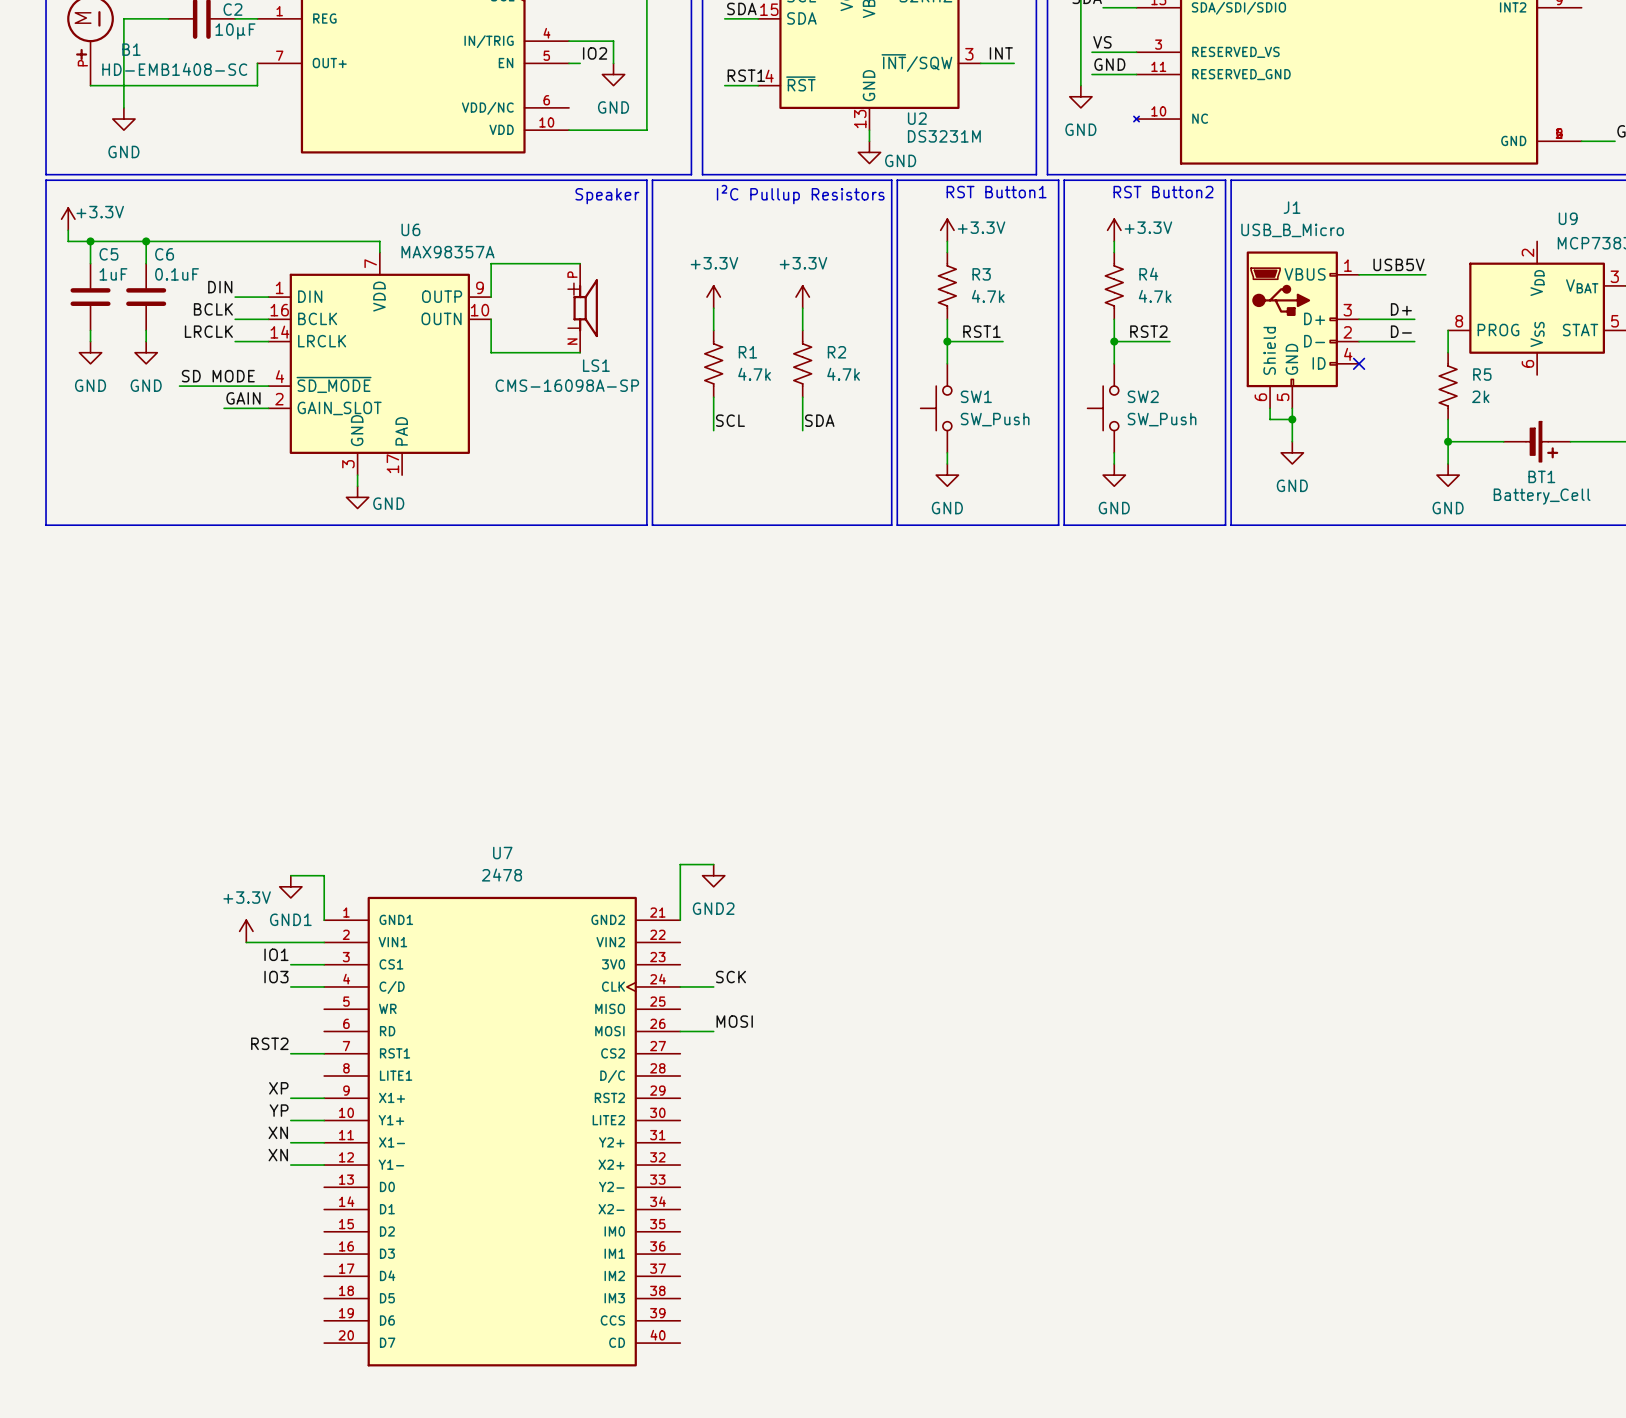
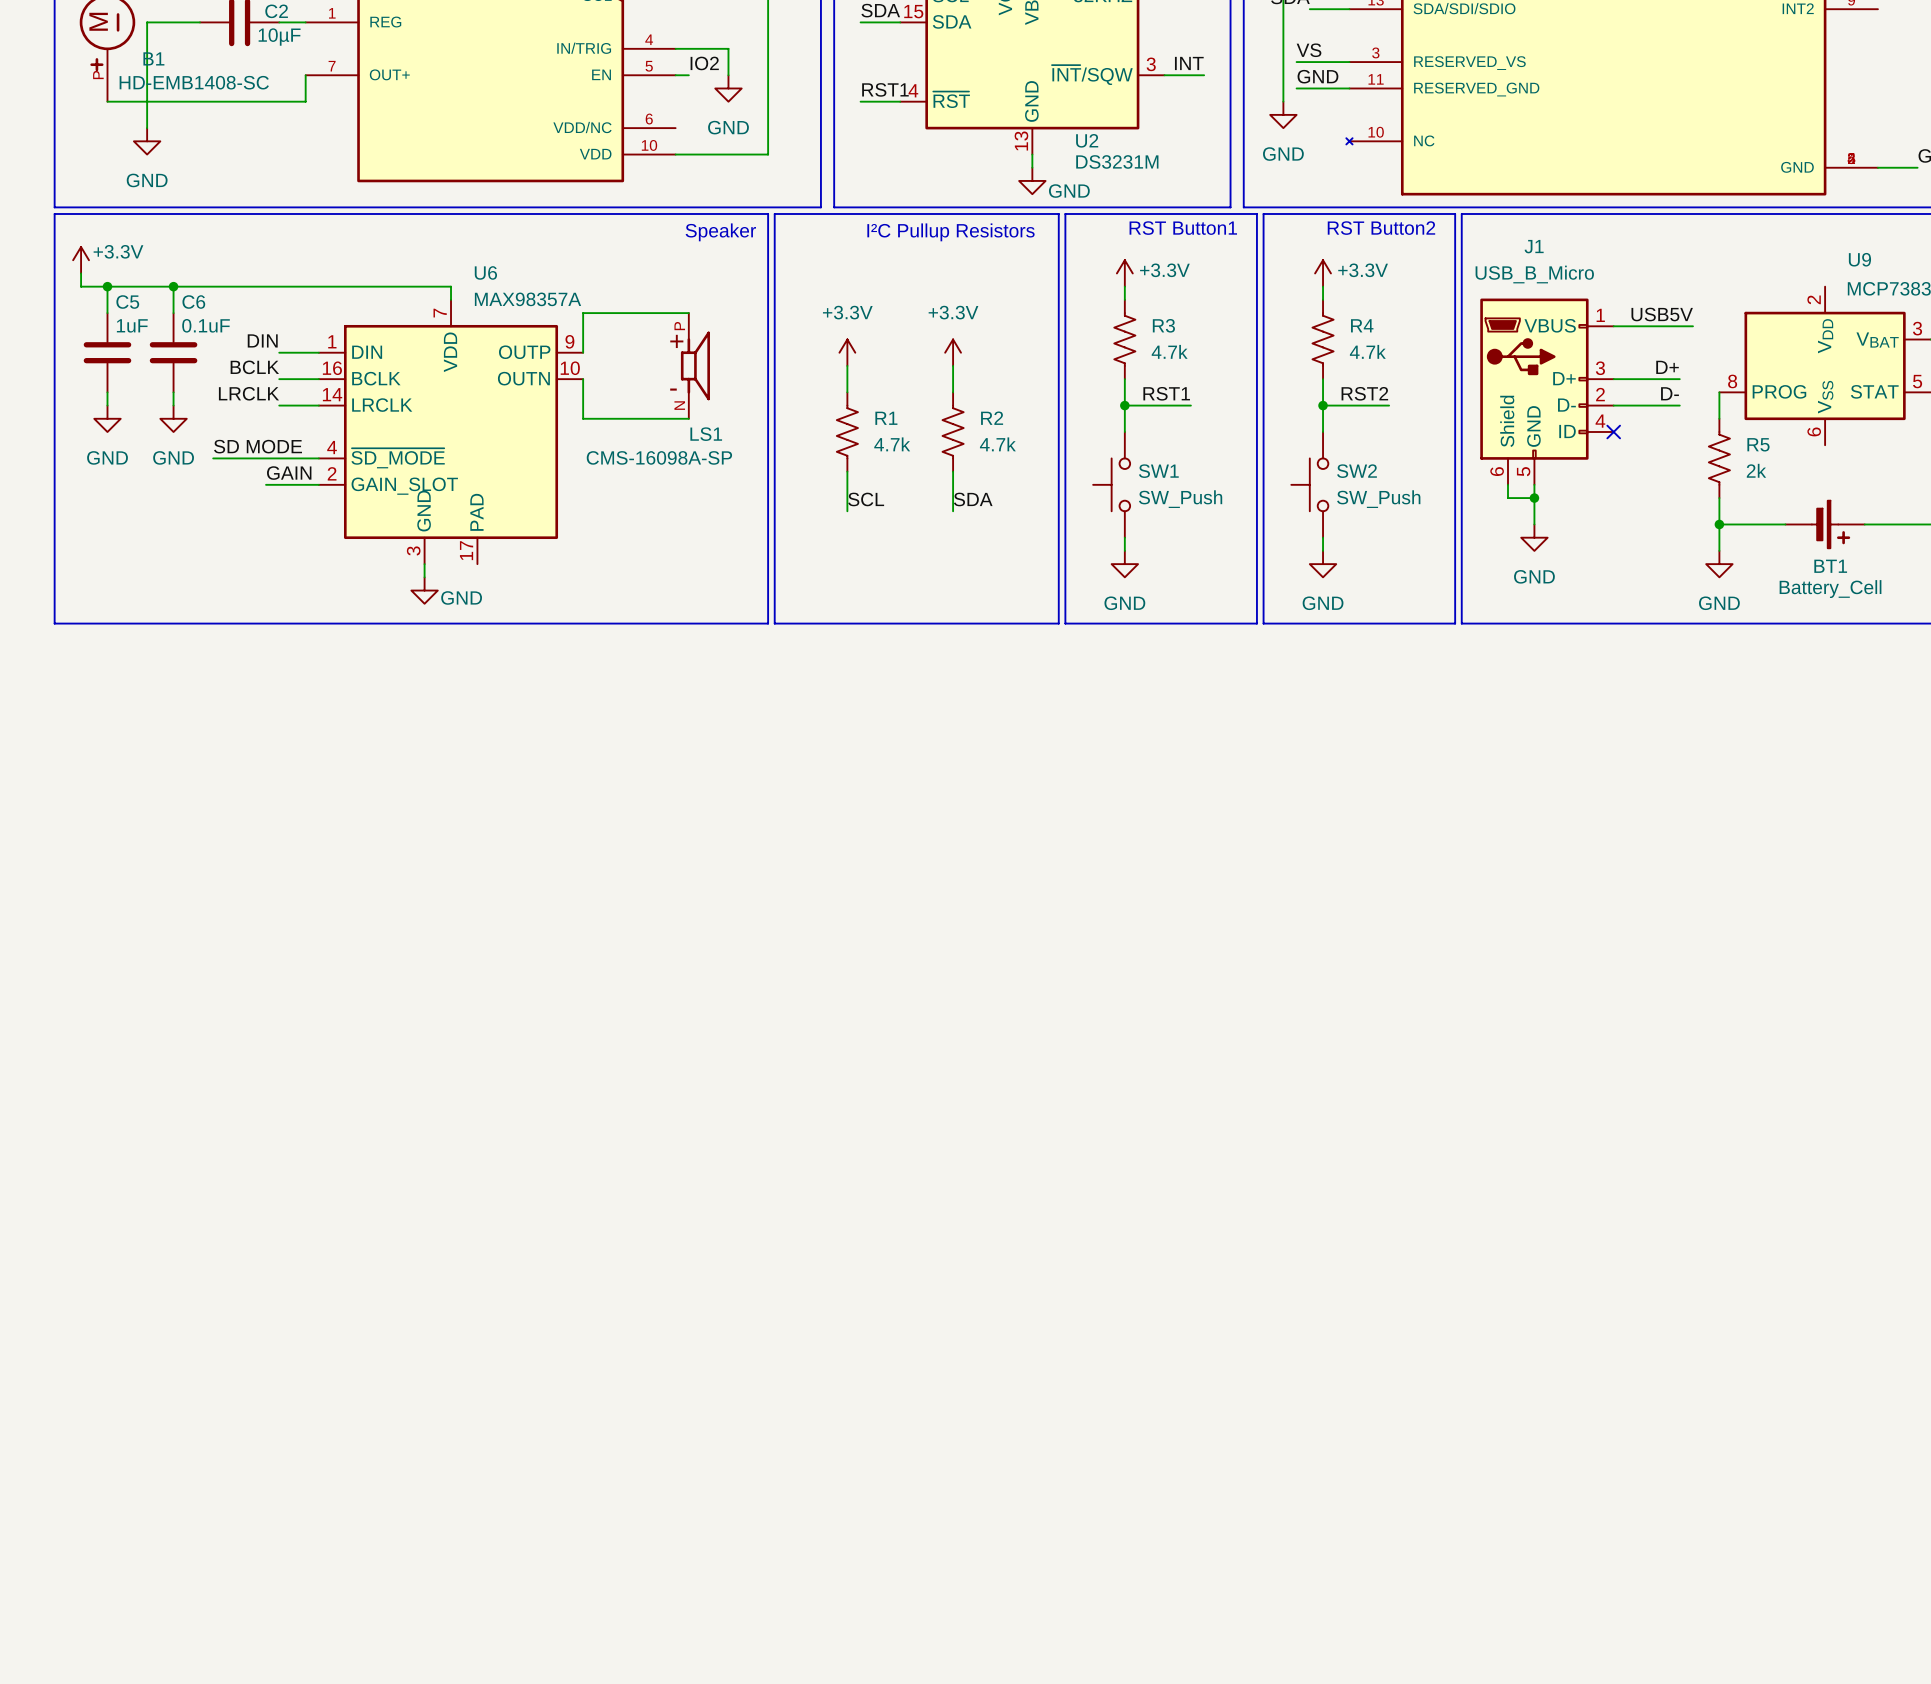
wire: (713, 864) (680, 864) (680, 920) -> none
wire: (290, 875) (324, 875) (324, 920) -> none
power symbol: GND2 (713, 875) -> none
power symbol: GND1 (290, 886) -> none
power symbol: +3.3V (246, 931) -> none
wire: (246, 942) (324, 942) -> none
label: IO1 (276, 954) -> none
wire: (290, 964) (324, 964) -> none
label: IO3 (276, 977) -> none
label: SCK (730, 977) -> none
wire: (290, 986) (324, 986) -> none
wire: (680, 986) (713, 986) -> none
label: MOSI (734, 1021) -> none
wire: (680, 1031) (713, 1031) -> none
label: RST2 (269, 1043) -> none
wire: (290, 1053) (324, 1053) -> none
label: XP (278, 1088) -> none
wire: (290, 1098) (324, 1098) -> none
label: YP (279, 1110) -> none
wire: (290, 1120) (324, 1120) -> none
U7: 2478 (502, 1131) -> none
label: XN (278, 1132) -> none
wire: (290, 1142) (324, 1142) -> none
label: XN (278, 1155) -> none
wire: (290, 1165) (324, 1165) -> none

